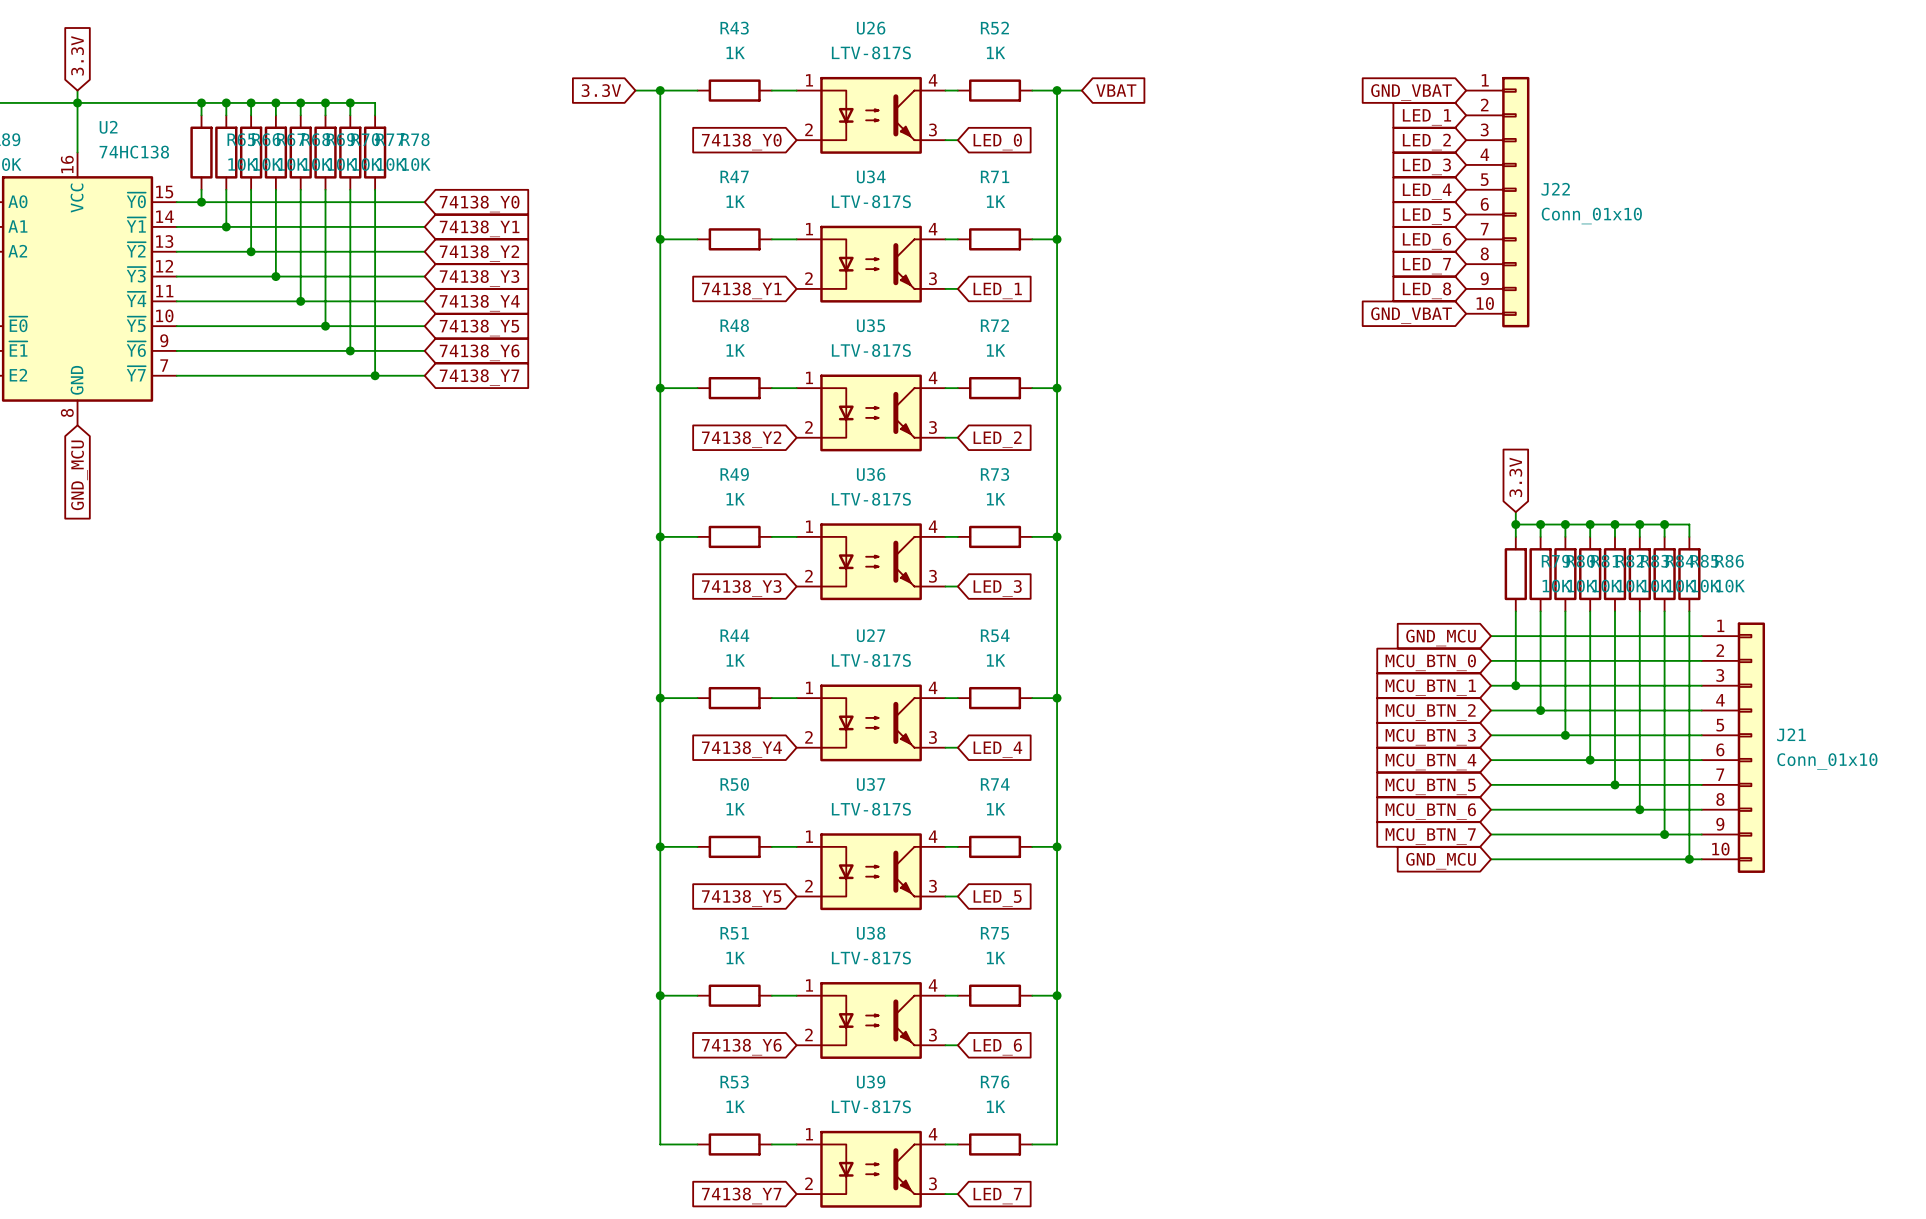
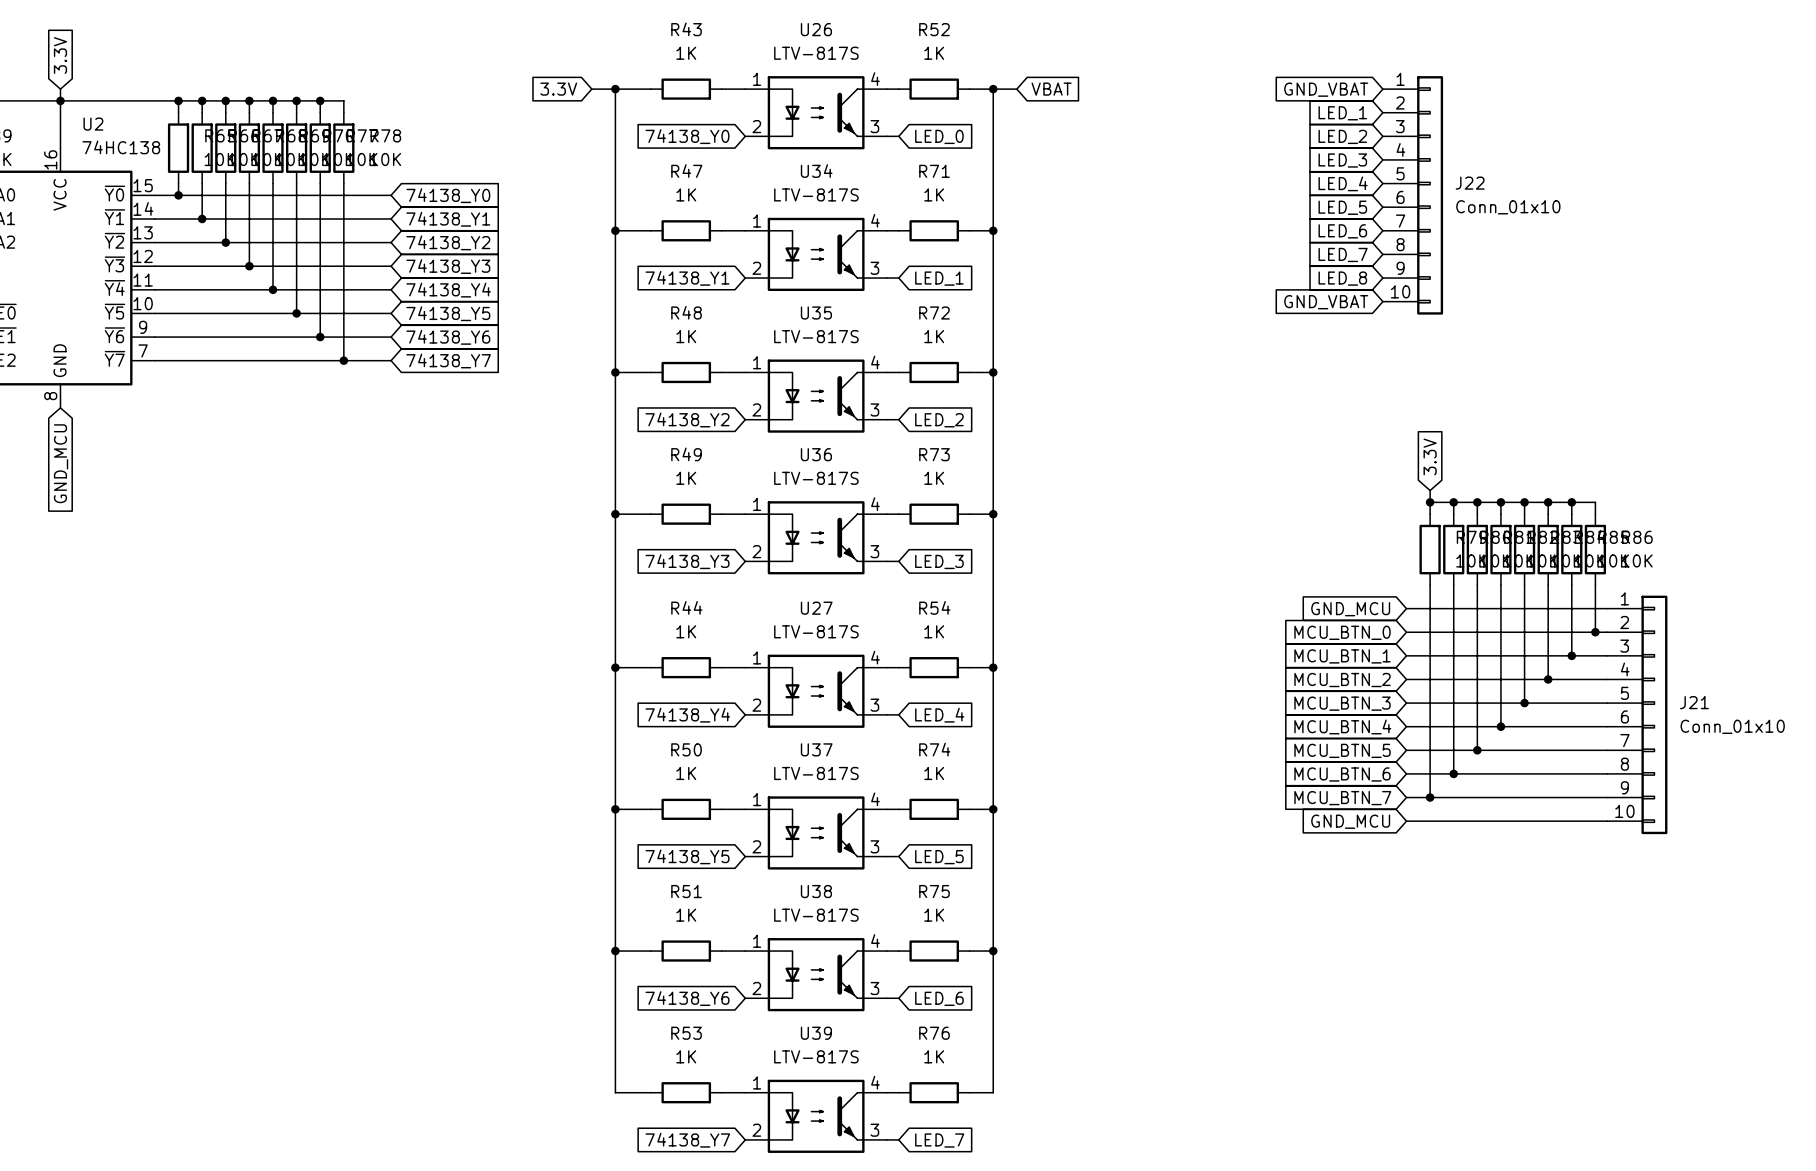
wire: (1689, 660) (1689, 859) -> none
junction: none -> (1595, 632)
junction: (1515, 685) -> none
wire: (1664, 685) (1664, 834) -> (1430, 655) (1430, 797)
junction: none -> (1571, 655)
junction: (1540, 710) -> none
wire: (1639, 710) (1639, 809) -> (1453, 679) (1453, 773)
junction: none -> (1548, 679)
junction: (1565, 735) -> none
wire: (1614, 735) (1614, 784) -> (1477, 703) (1477, 750)
junction: none -> (1524, 703)
junction: none -> (1477, 750)
junction: (1614, 784) -> none
junction: none -> (1453, 773)
junction: (1639, 809) -> none
junction: none -> (1430, 797)
junction: (1664, 834) -> none
junction: (1689, 859) -> none

